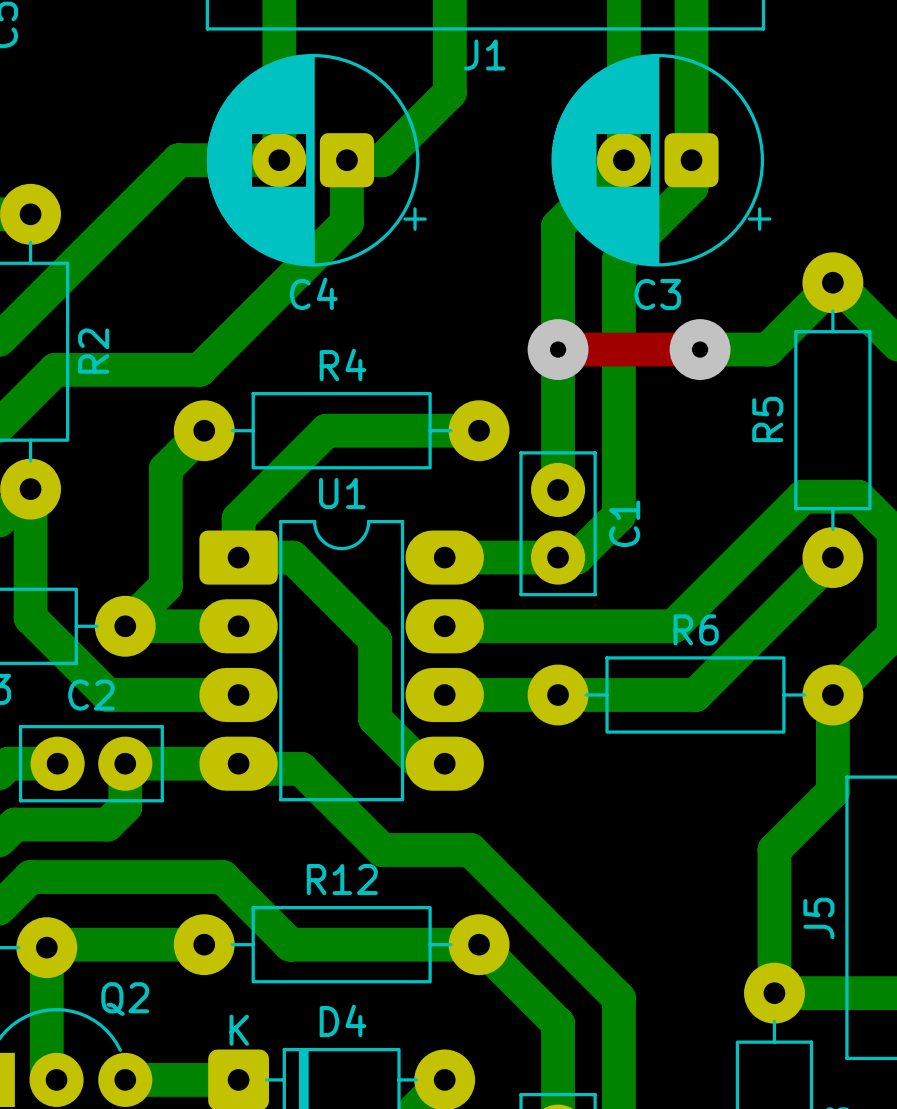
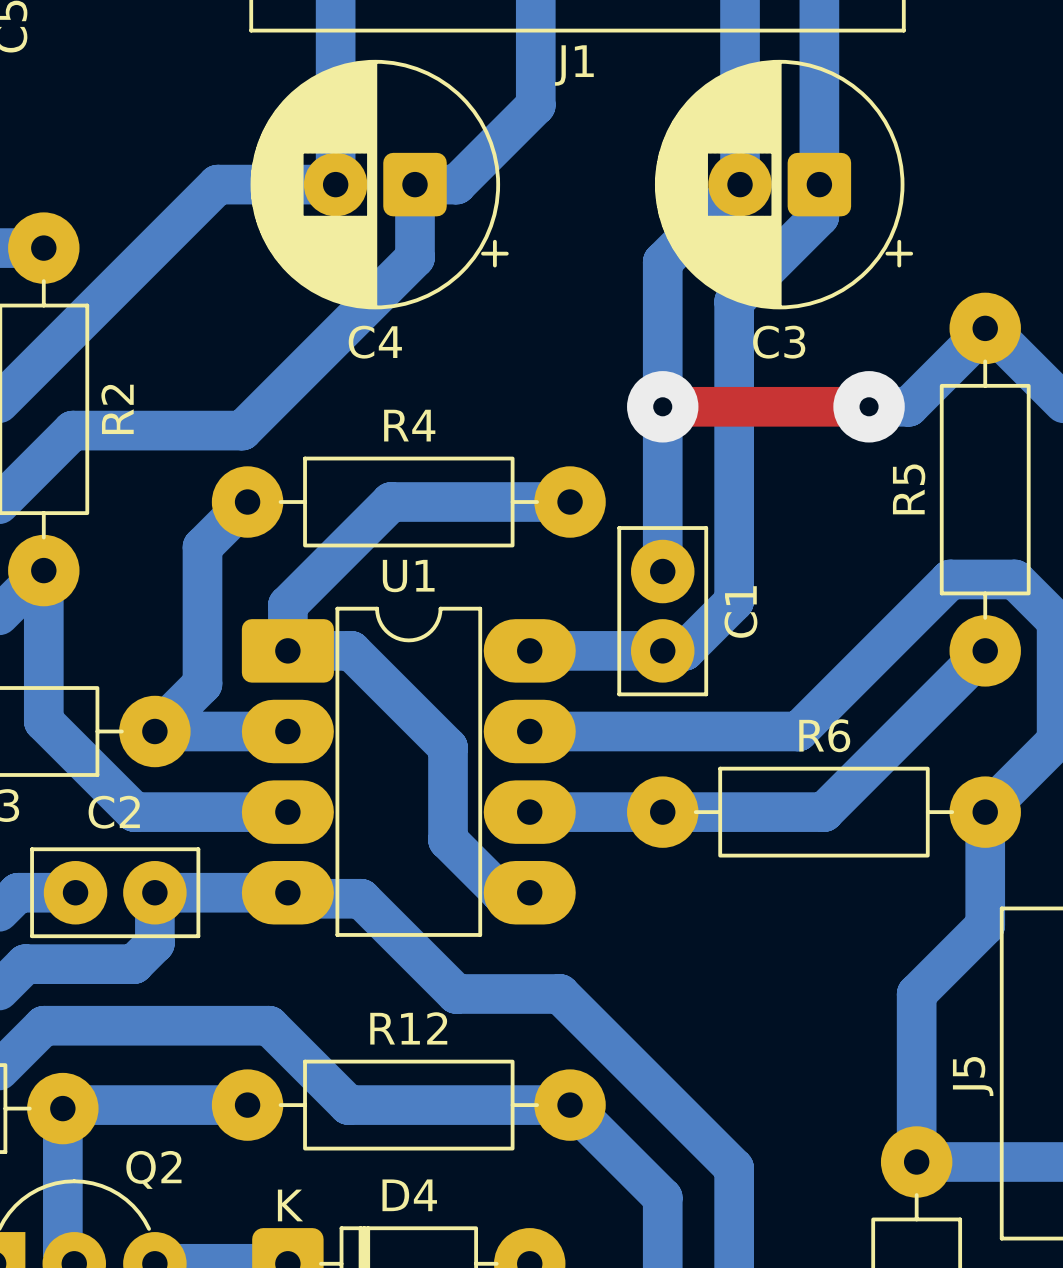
via position: (700, 349) -> (869, 406)

